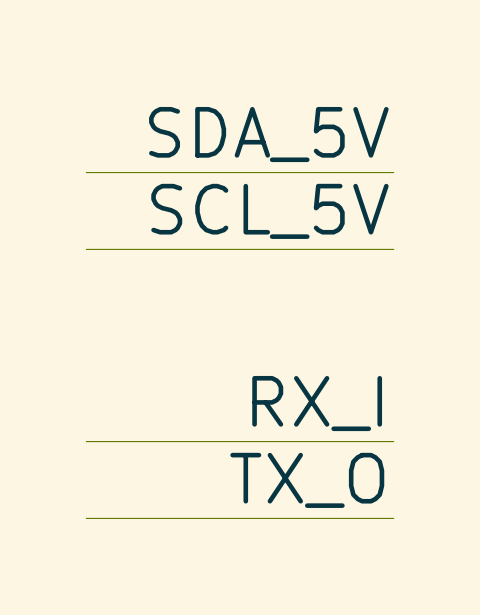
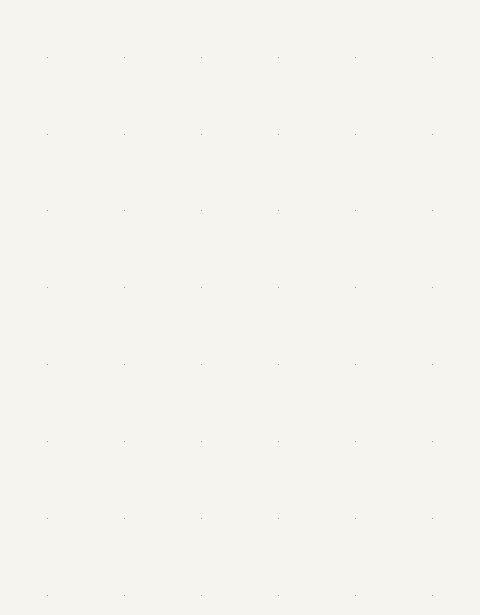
label: SDA_5V (268, 134) -> none
wire: (86, 172) (393, 172) -> none
label: SCL_5V (269, 211) -> none
wire: (86, 249) (393, 249) -> none
label: RX_I (317, 403) -> none
wire: (86, 441) (393, 441) -> none
label: TX_O (307, 480) -> none
wire: (86, 518) (393, 518) -> none

